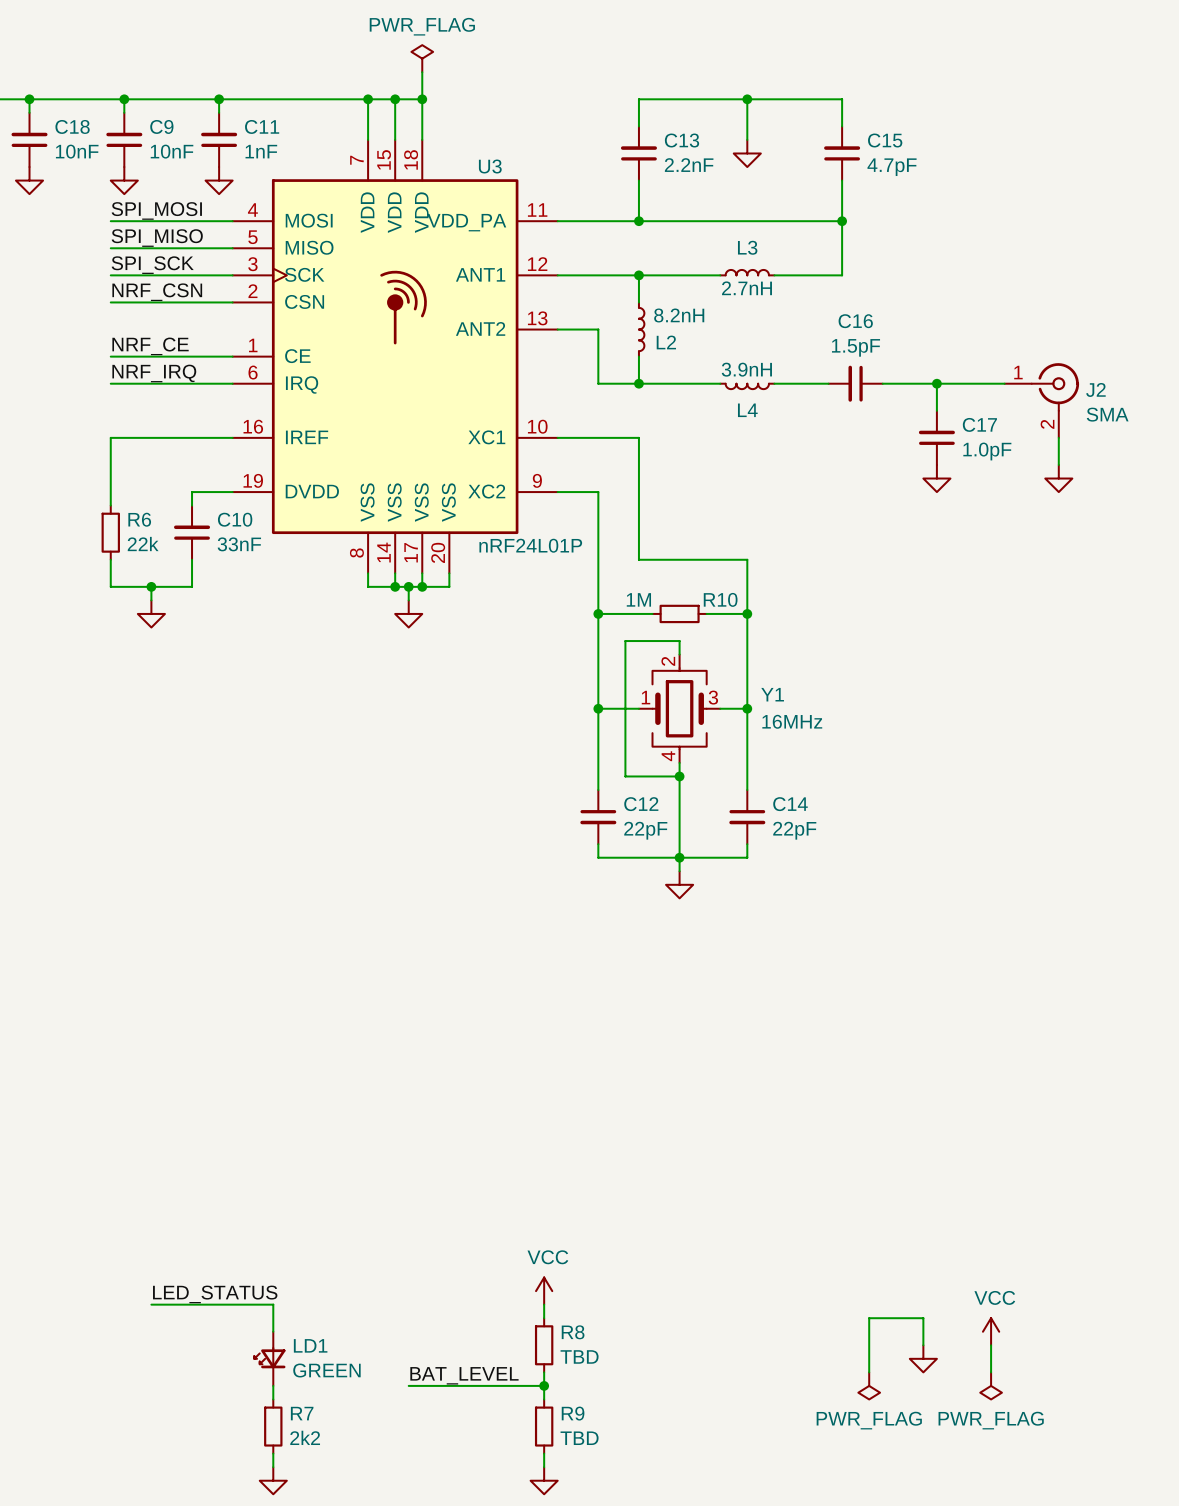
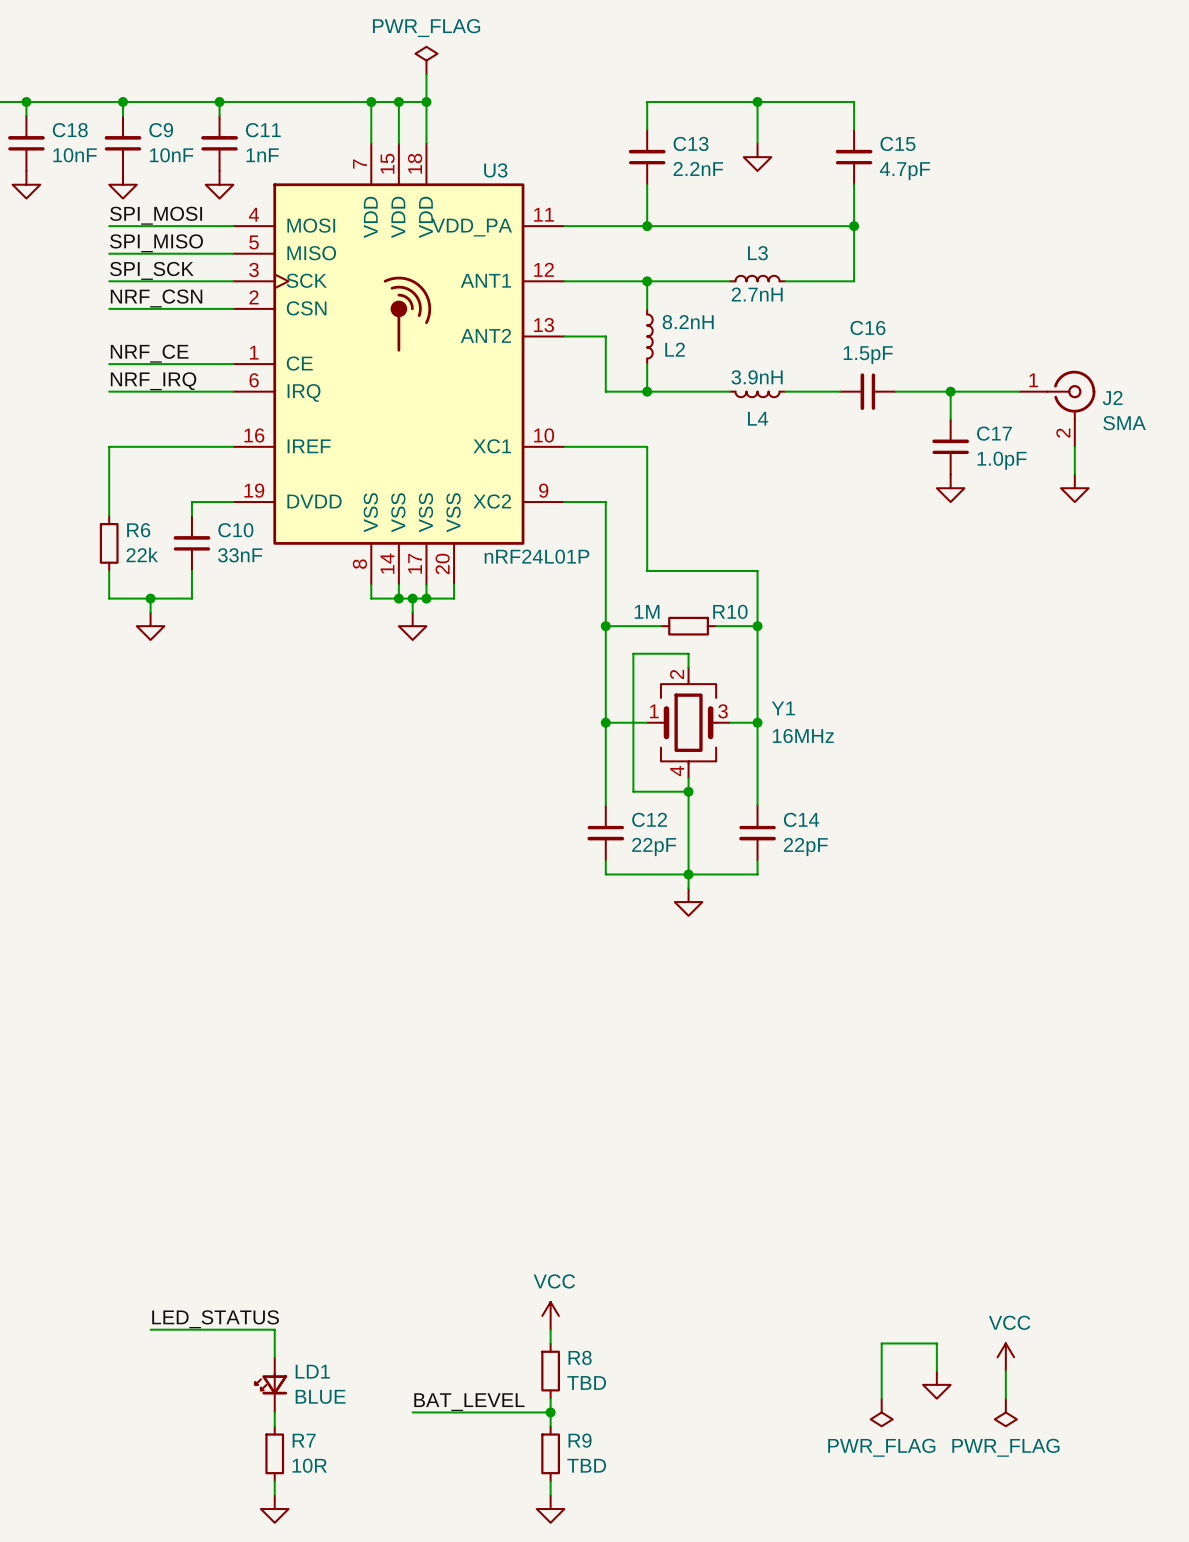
LD1 value: GREEN (326, 1370) -> BLUE (320, 1396)
R7 value: 2k2 (305, 1437) -> 10R (309, 1465)

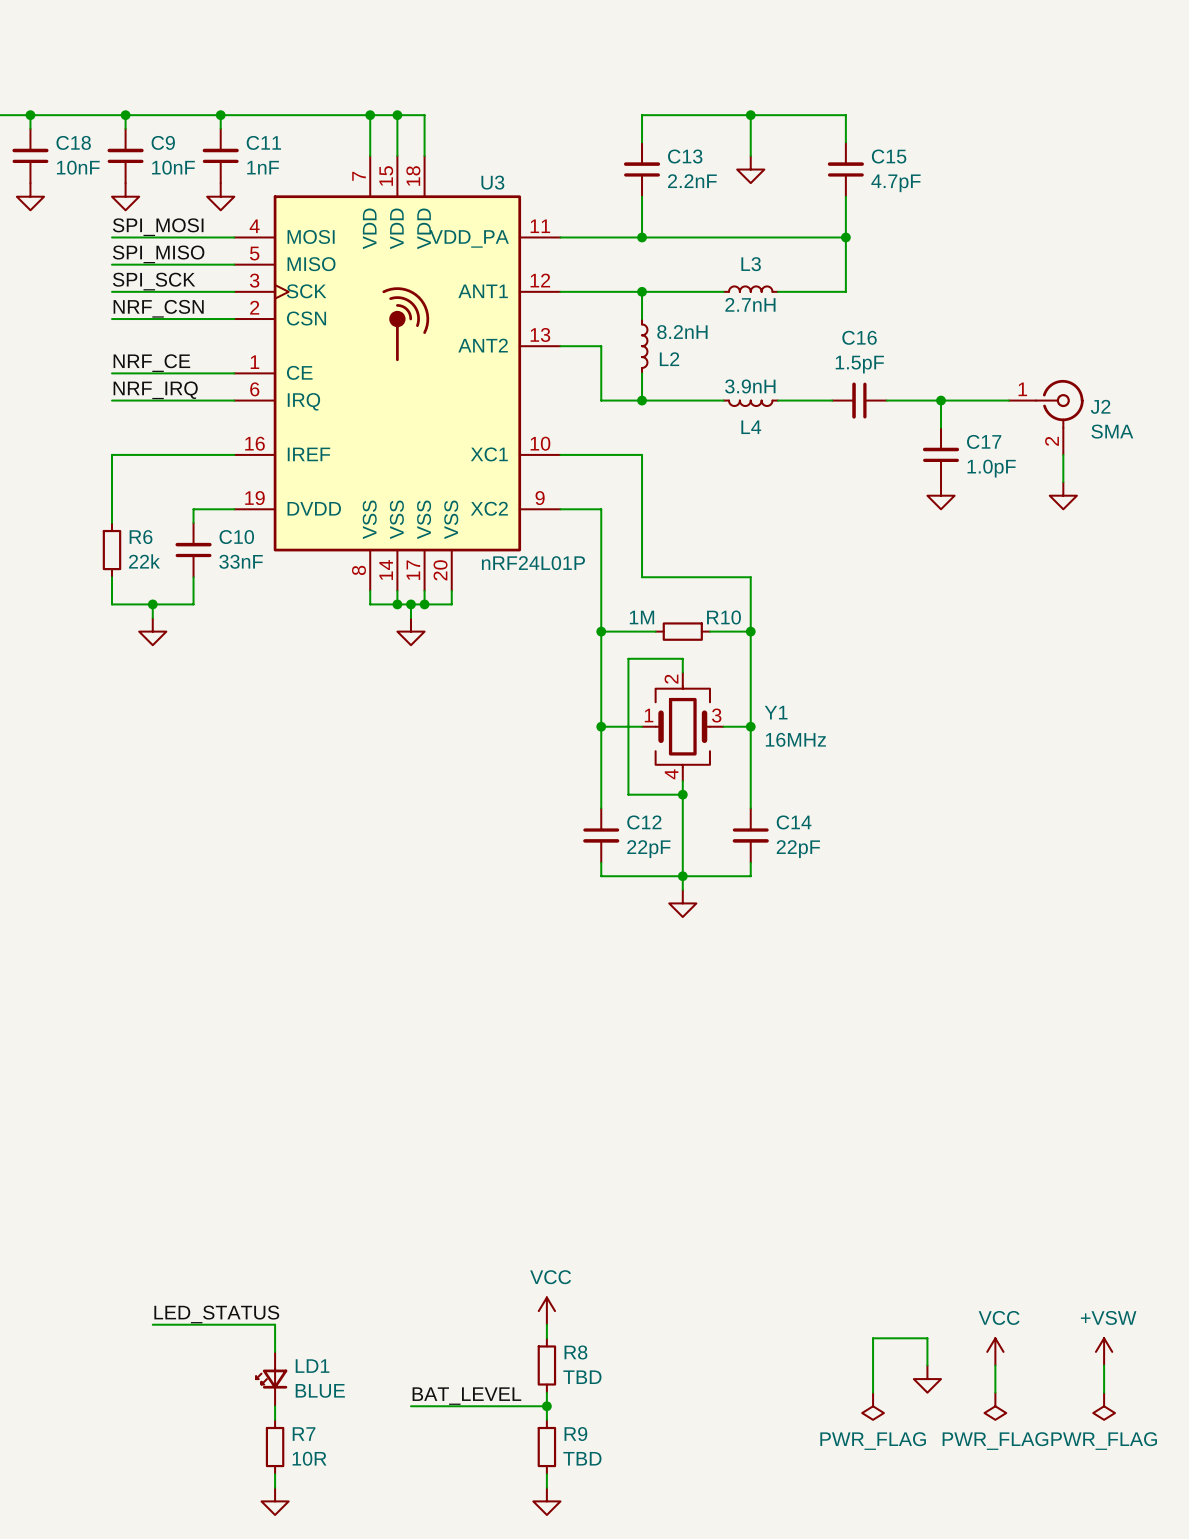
power symbol: PWR_FLAG (426, 60) -> none
wire: (426, 74) (426, 101) -> none
junction: (426, 101) -> none
power symbol: none -> +VSW (1104, 1351)
wire: none -> (1104, 1365) (1104, 1392)
power symbol: none -> PWR_FLAG (1104, 1406)

